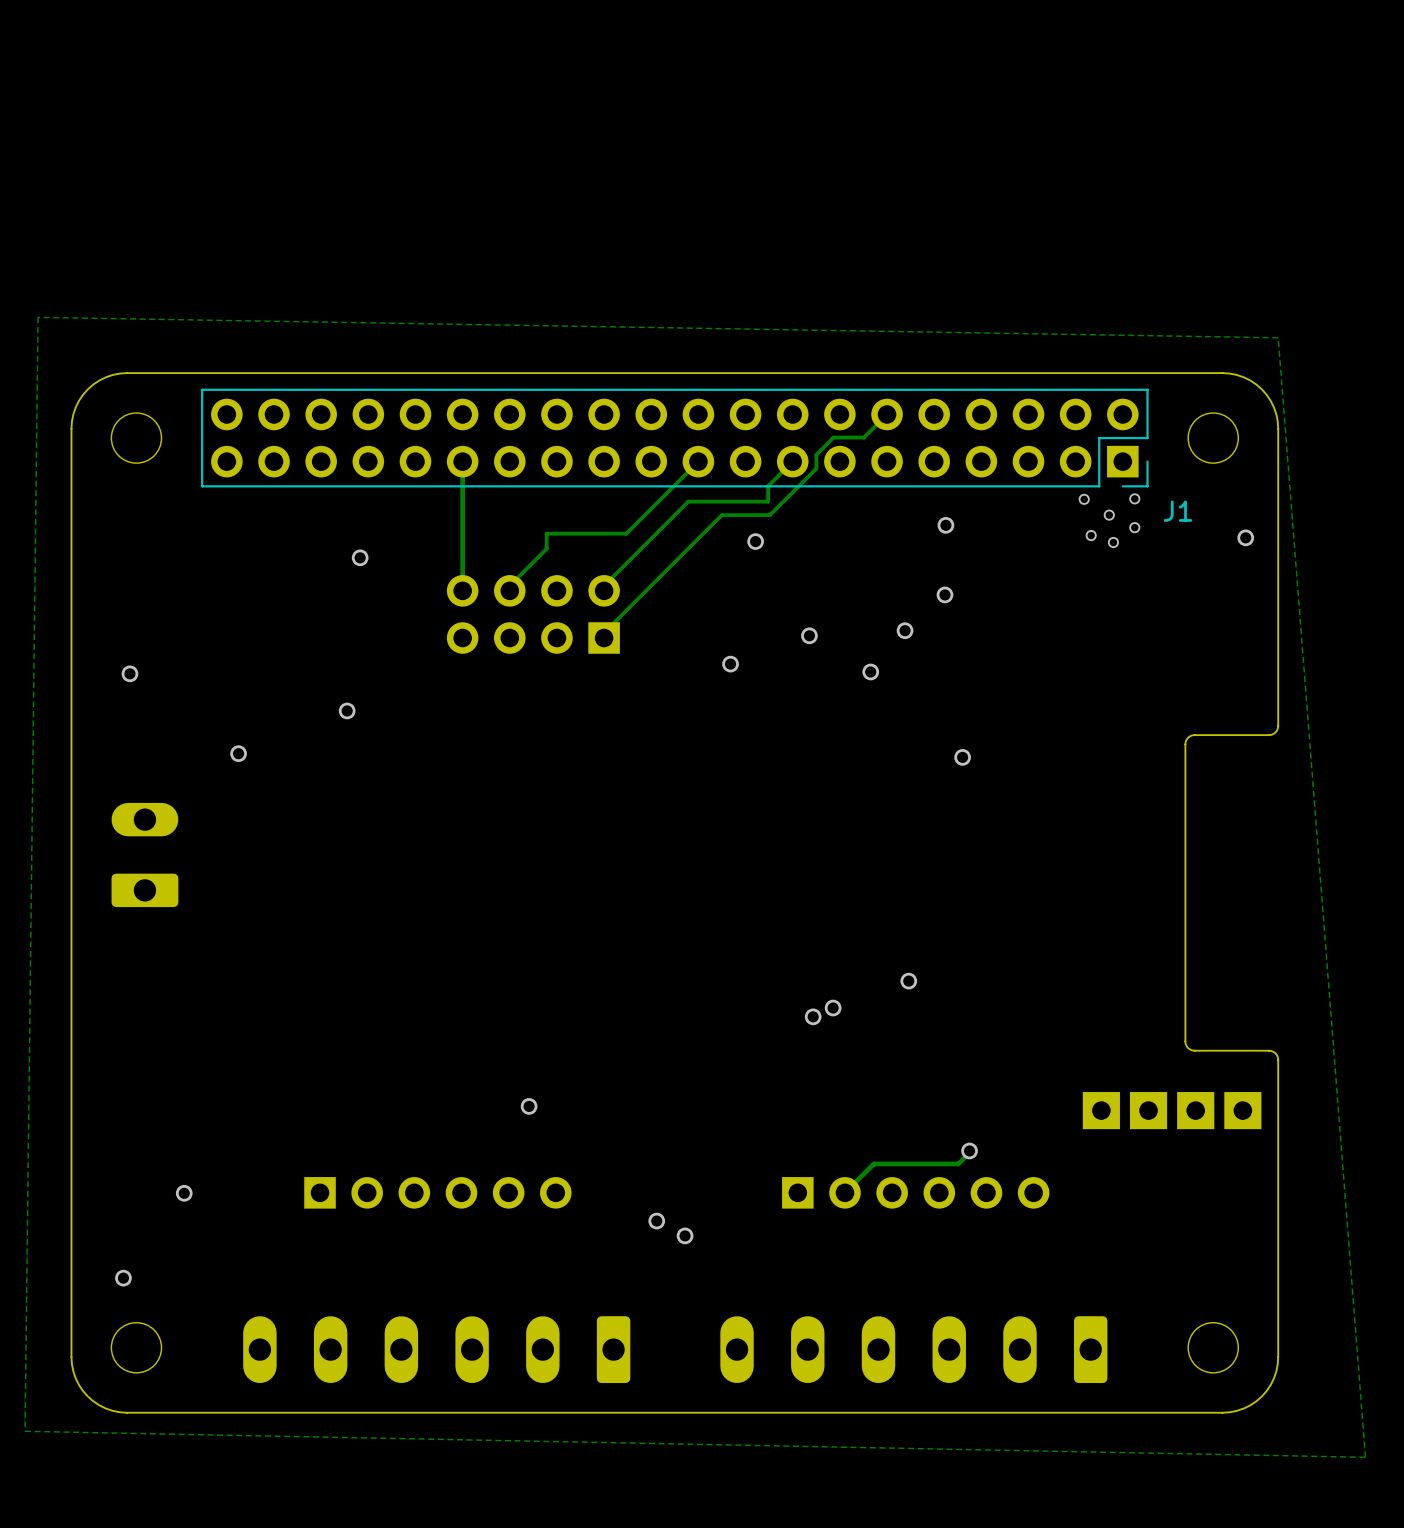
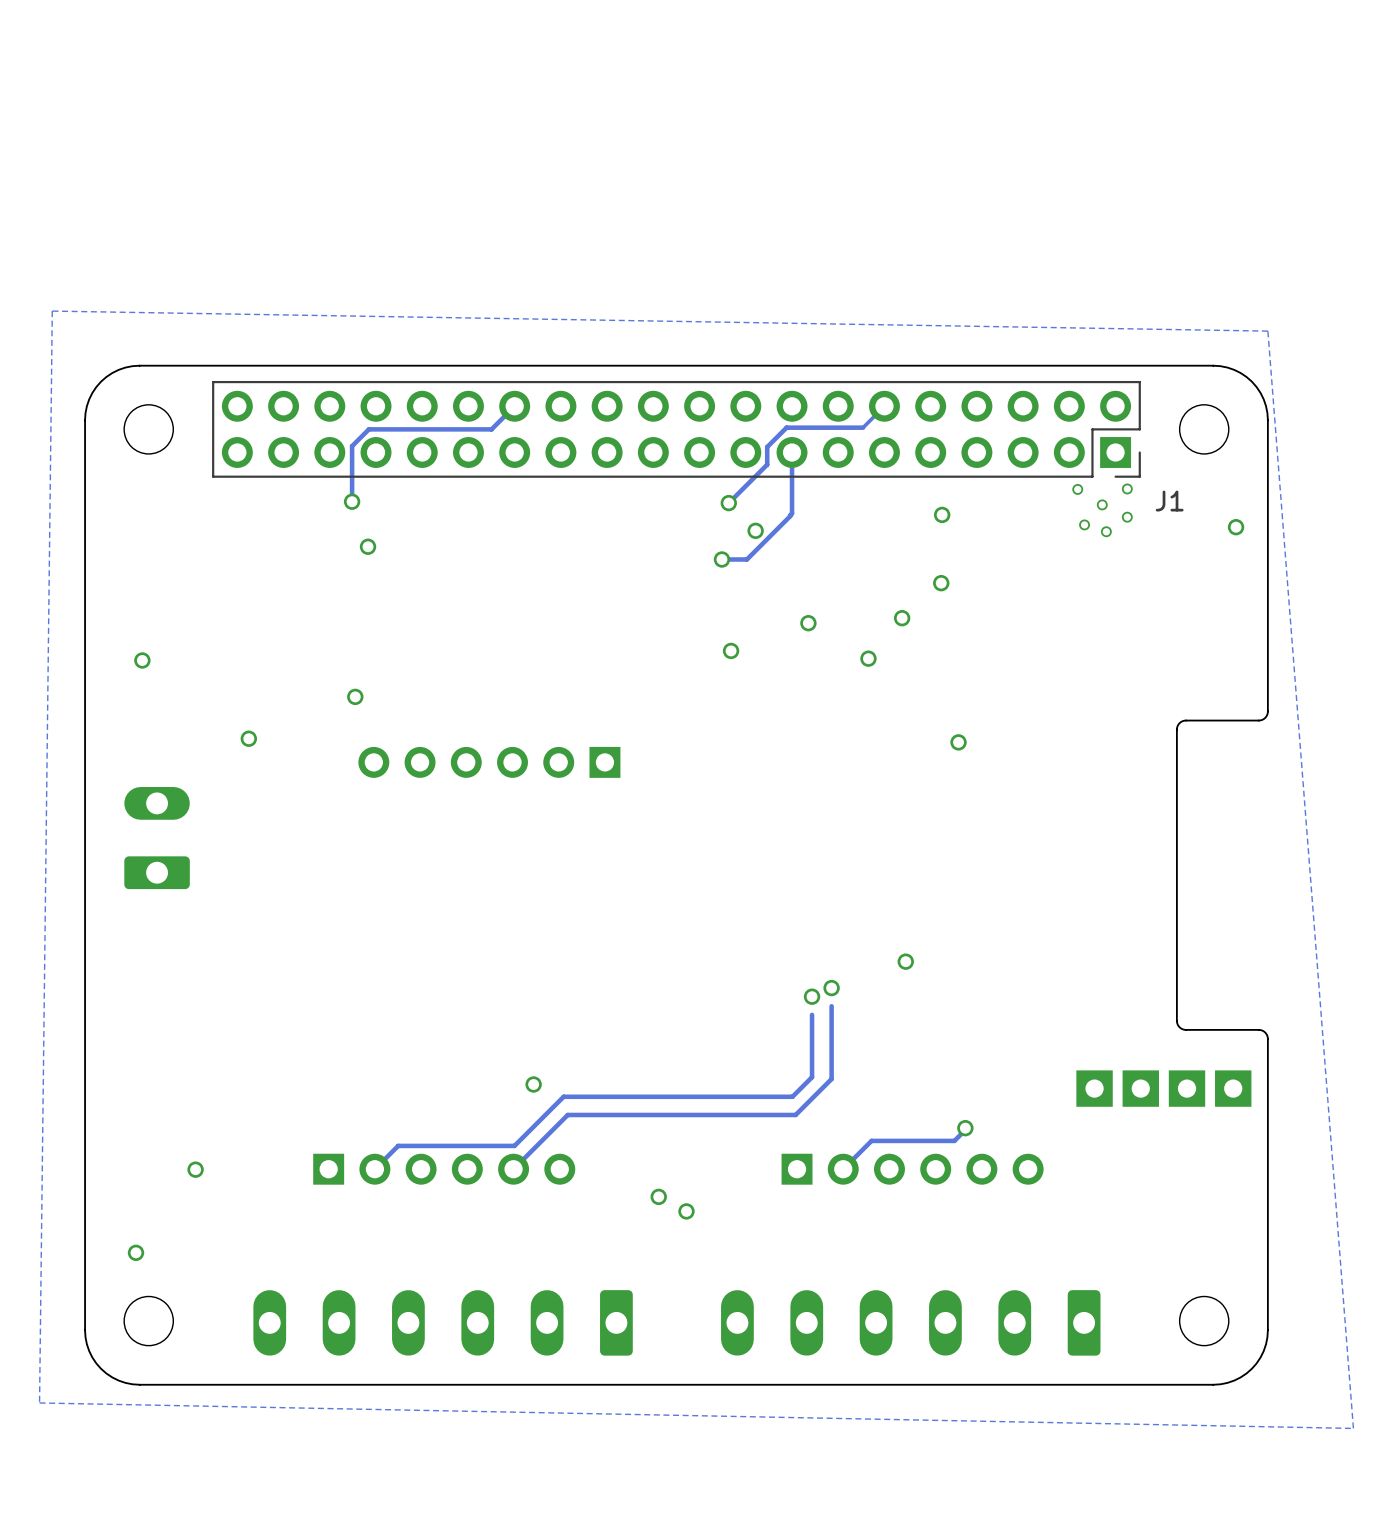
track: none -> (514, 406) (491, 429) (368, 429) (352, 446) (352, 501)
track: (865, 436) (833, 437) (816, 454) (816, 468) (769, 515) (721, 515) (600, 636) -> (863, 427) (786, 427) (767, 447) (767, 464) (728, 503)
track: (462, 461) (462, 590) -> none
track: (698, 461) (626, 533) (546, 533) (546, 548) (505, 589) -> none
track: (792, 461) (768, 486) (768, 501) (688, 501) (600, 589) -> (792, 452) (792, 513) (746, 559) (721, 559)
via: none -> (352, 501)
via: none -> (728, 503)
via: none -> (721, 559)
part: (533, 614) -> none
part: none -> (489, 762)
track: none -> (831, 1006) (831, 1079) (795, 1114) (567, 1114) (513, 1169)
track: none -> (812, 1014) (812, 1077) (792, 1096) (563, 1096) (514, 1145) (398, 1145) (374, 1169)

